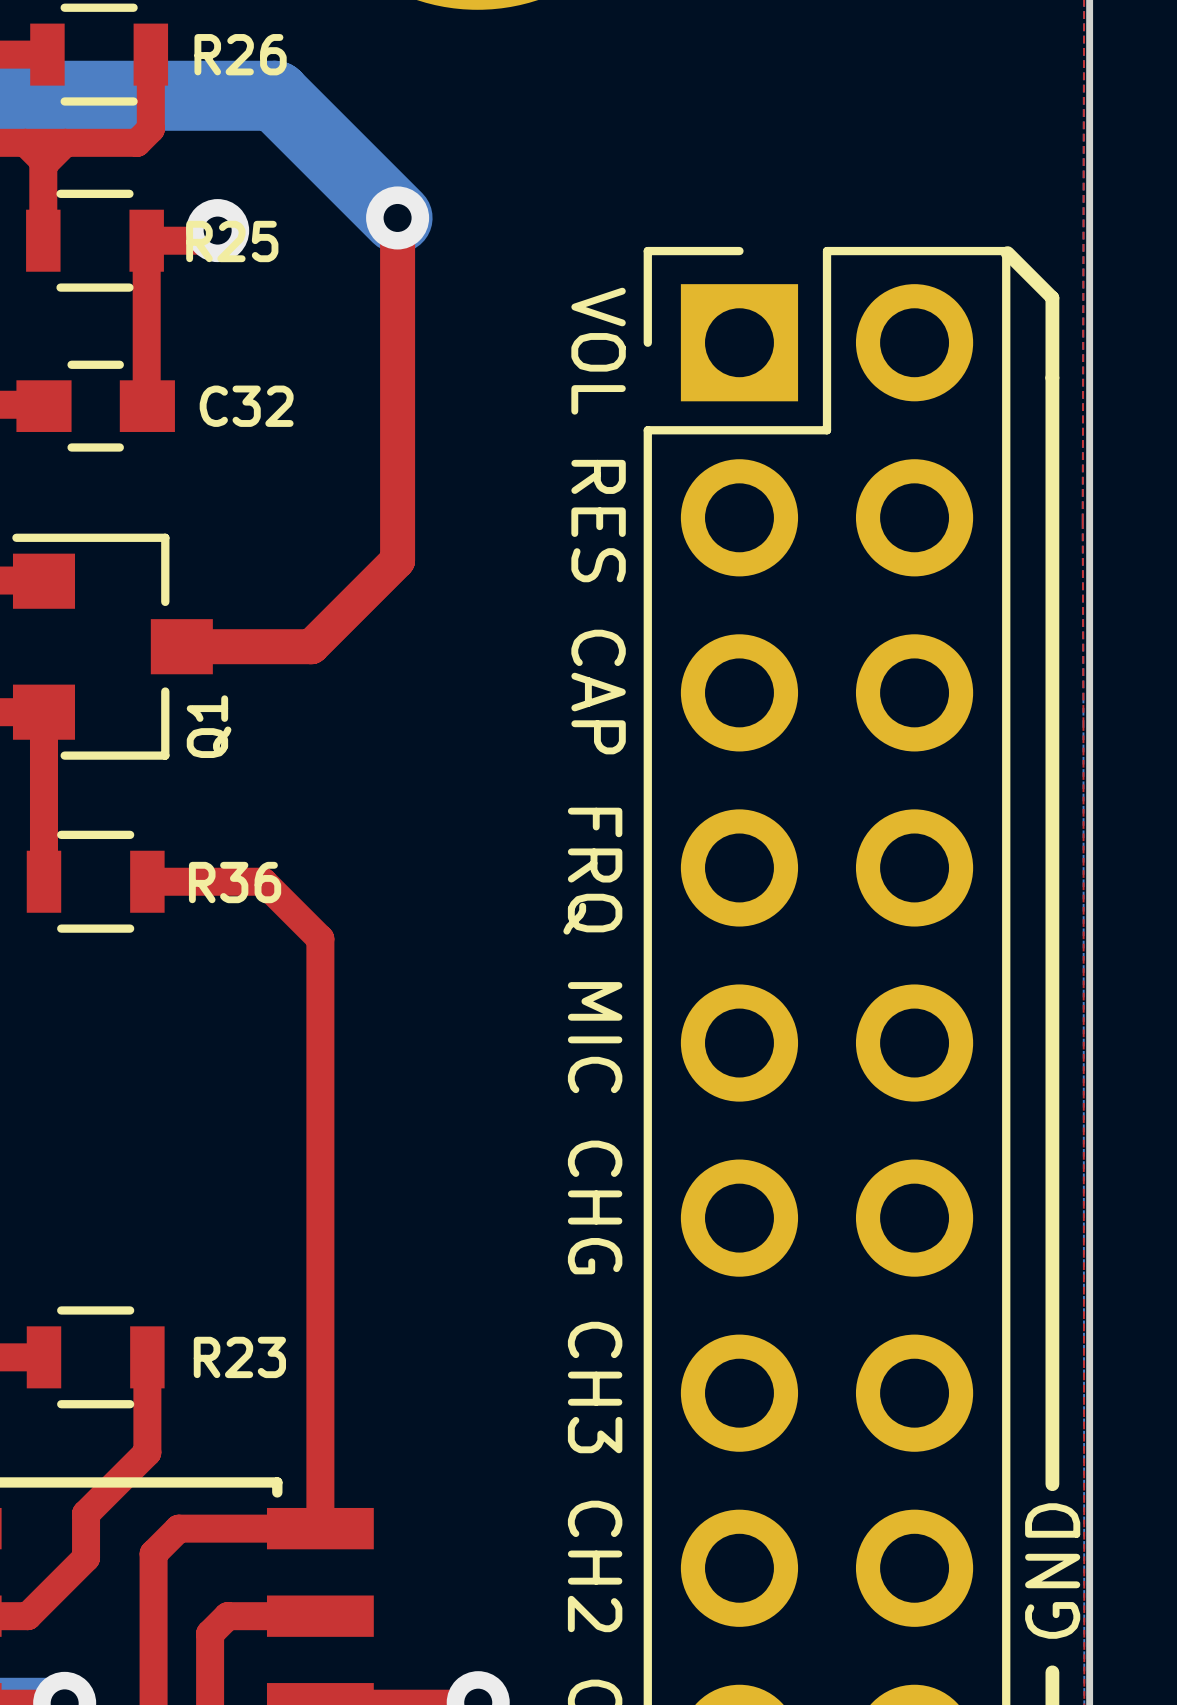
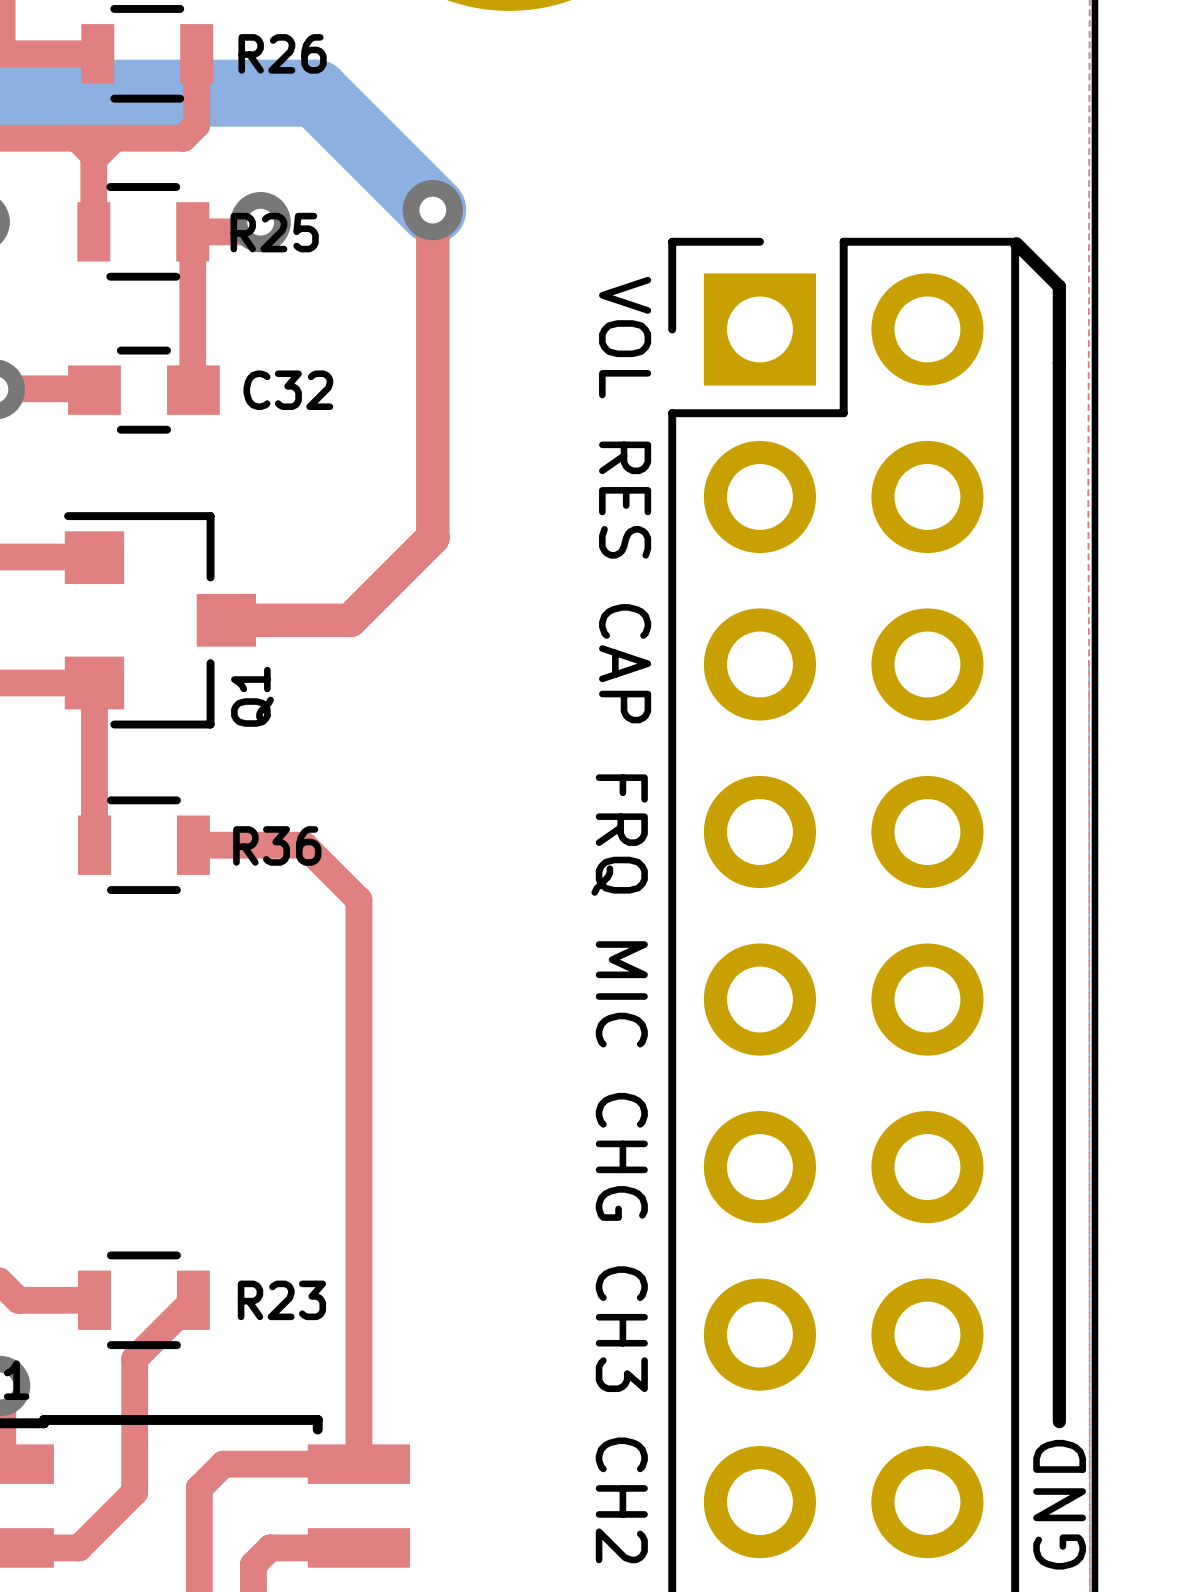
top track: (147, 1357) (147, 1452) (86, 1513) -> (193, 1300) (134, 1358) (134, 1449)

